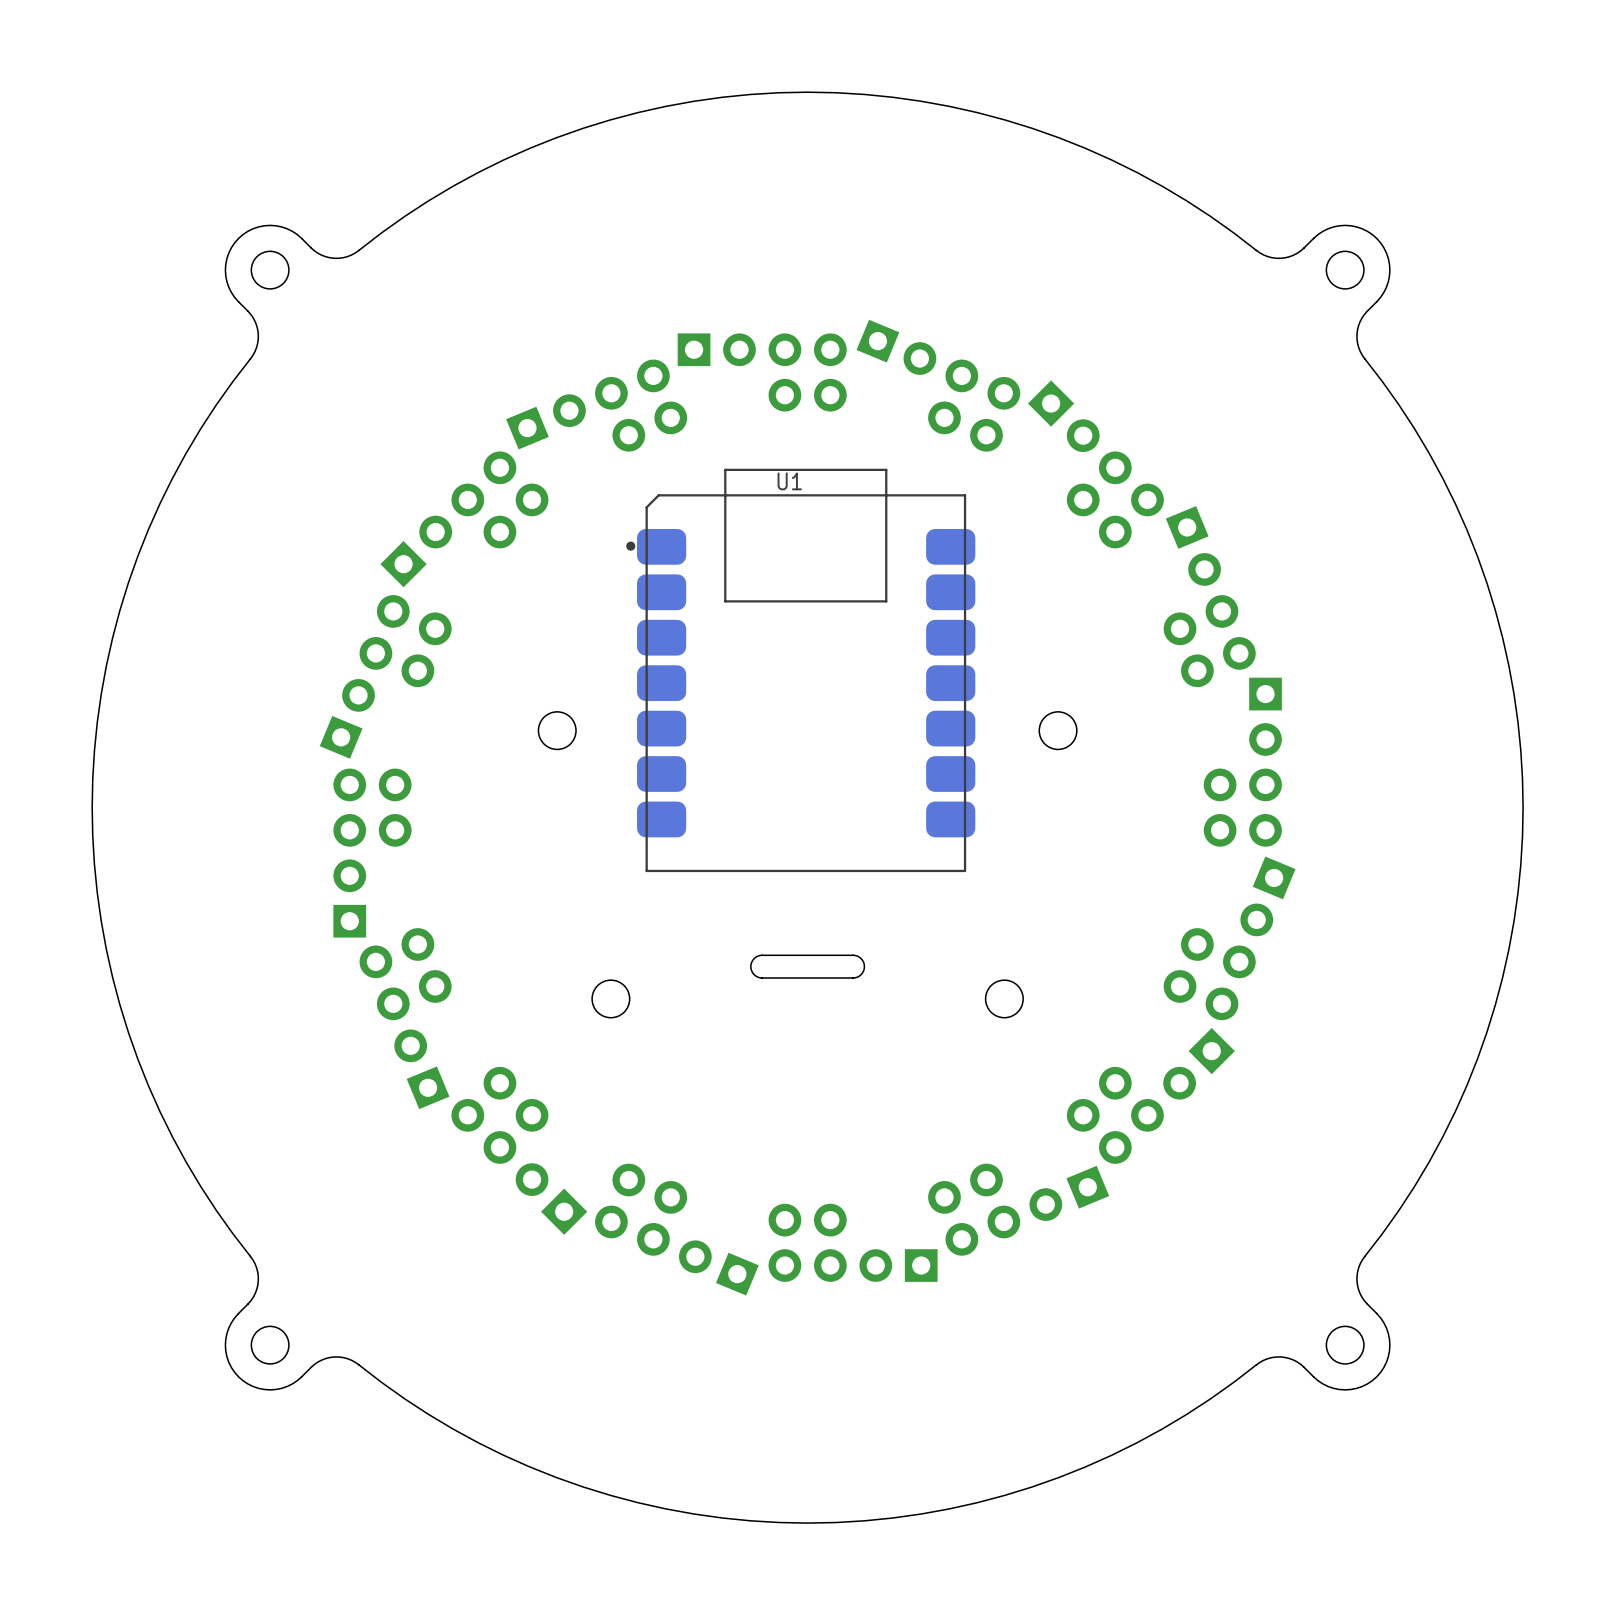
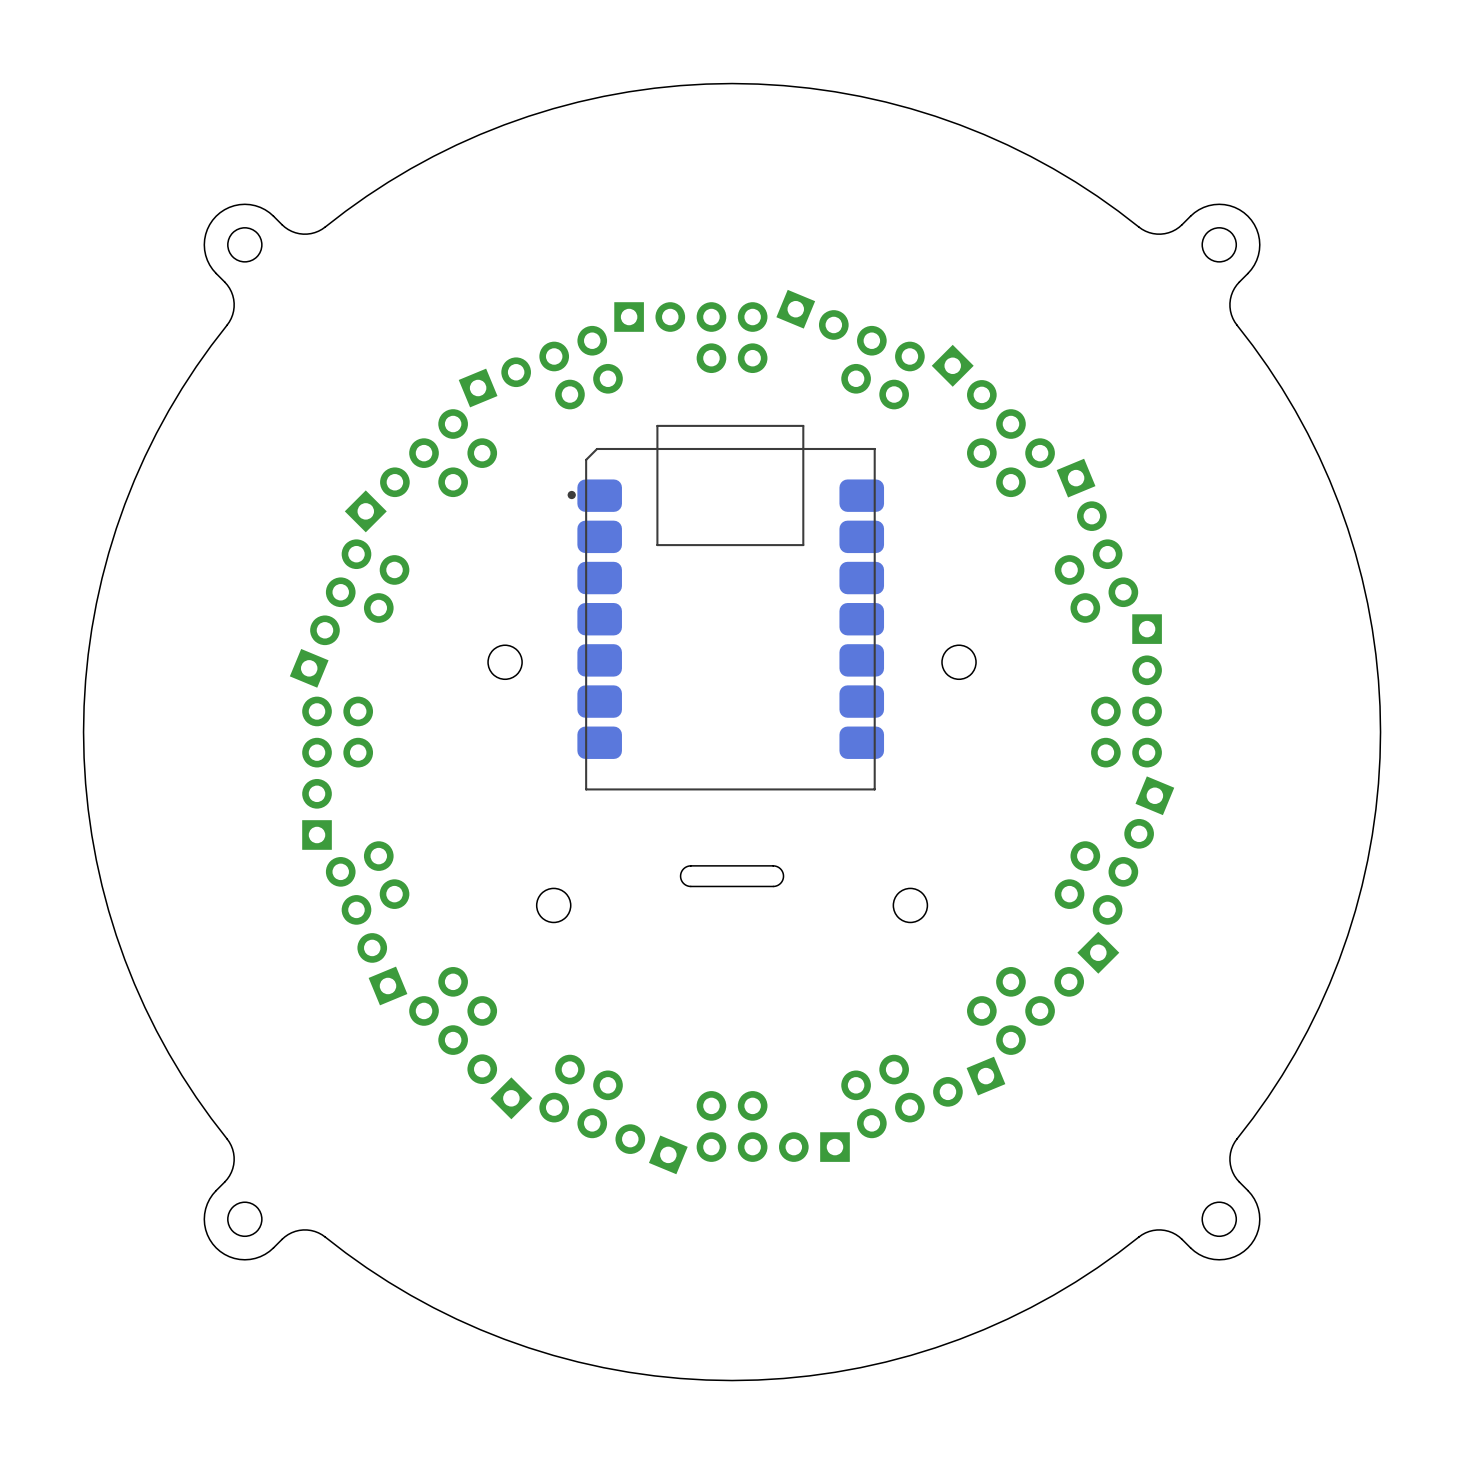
U1 name: U1 (789, 481) -> none

